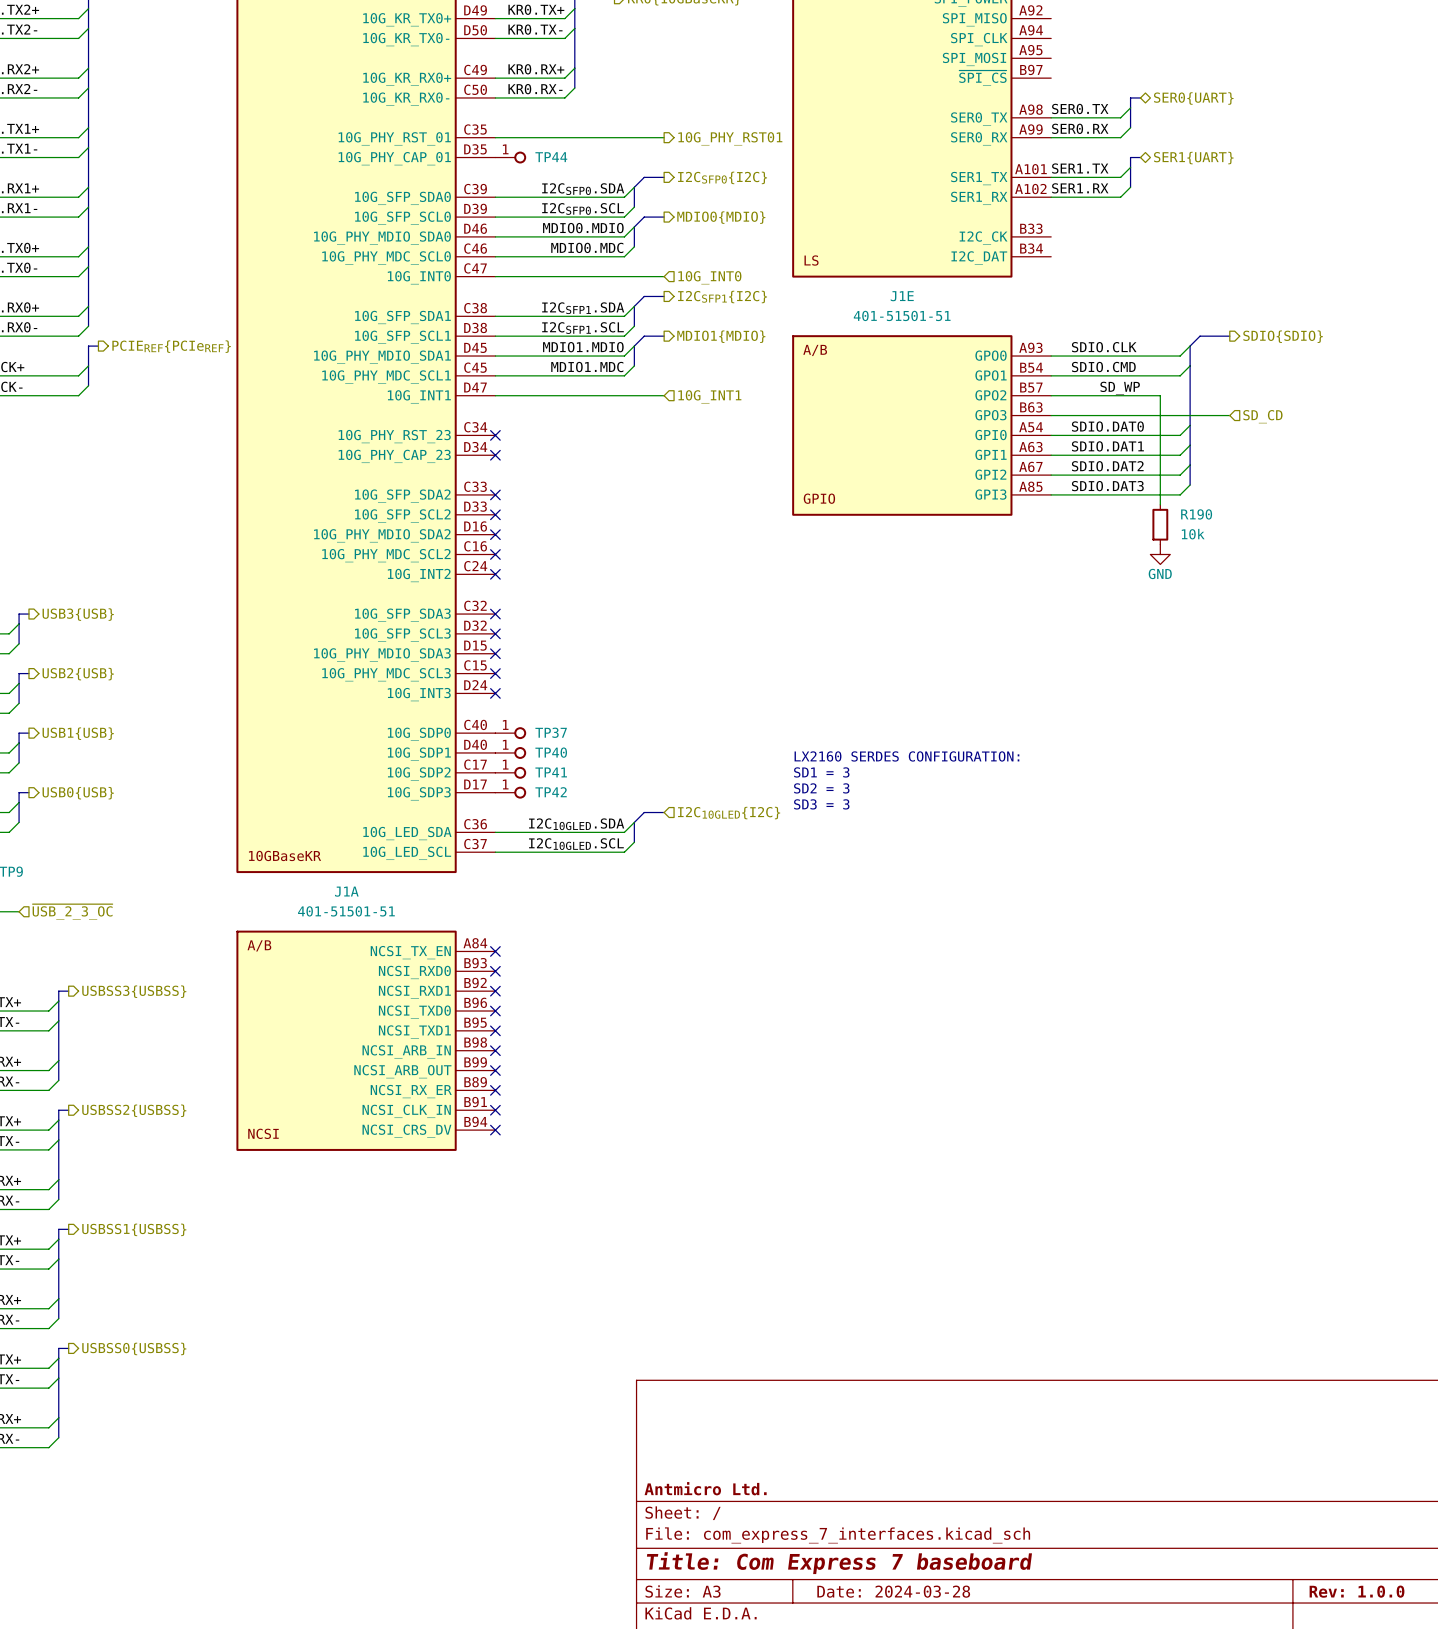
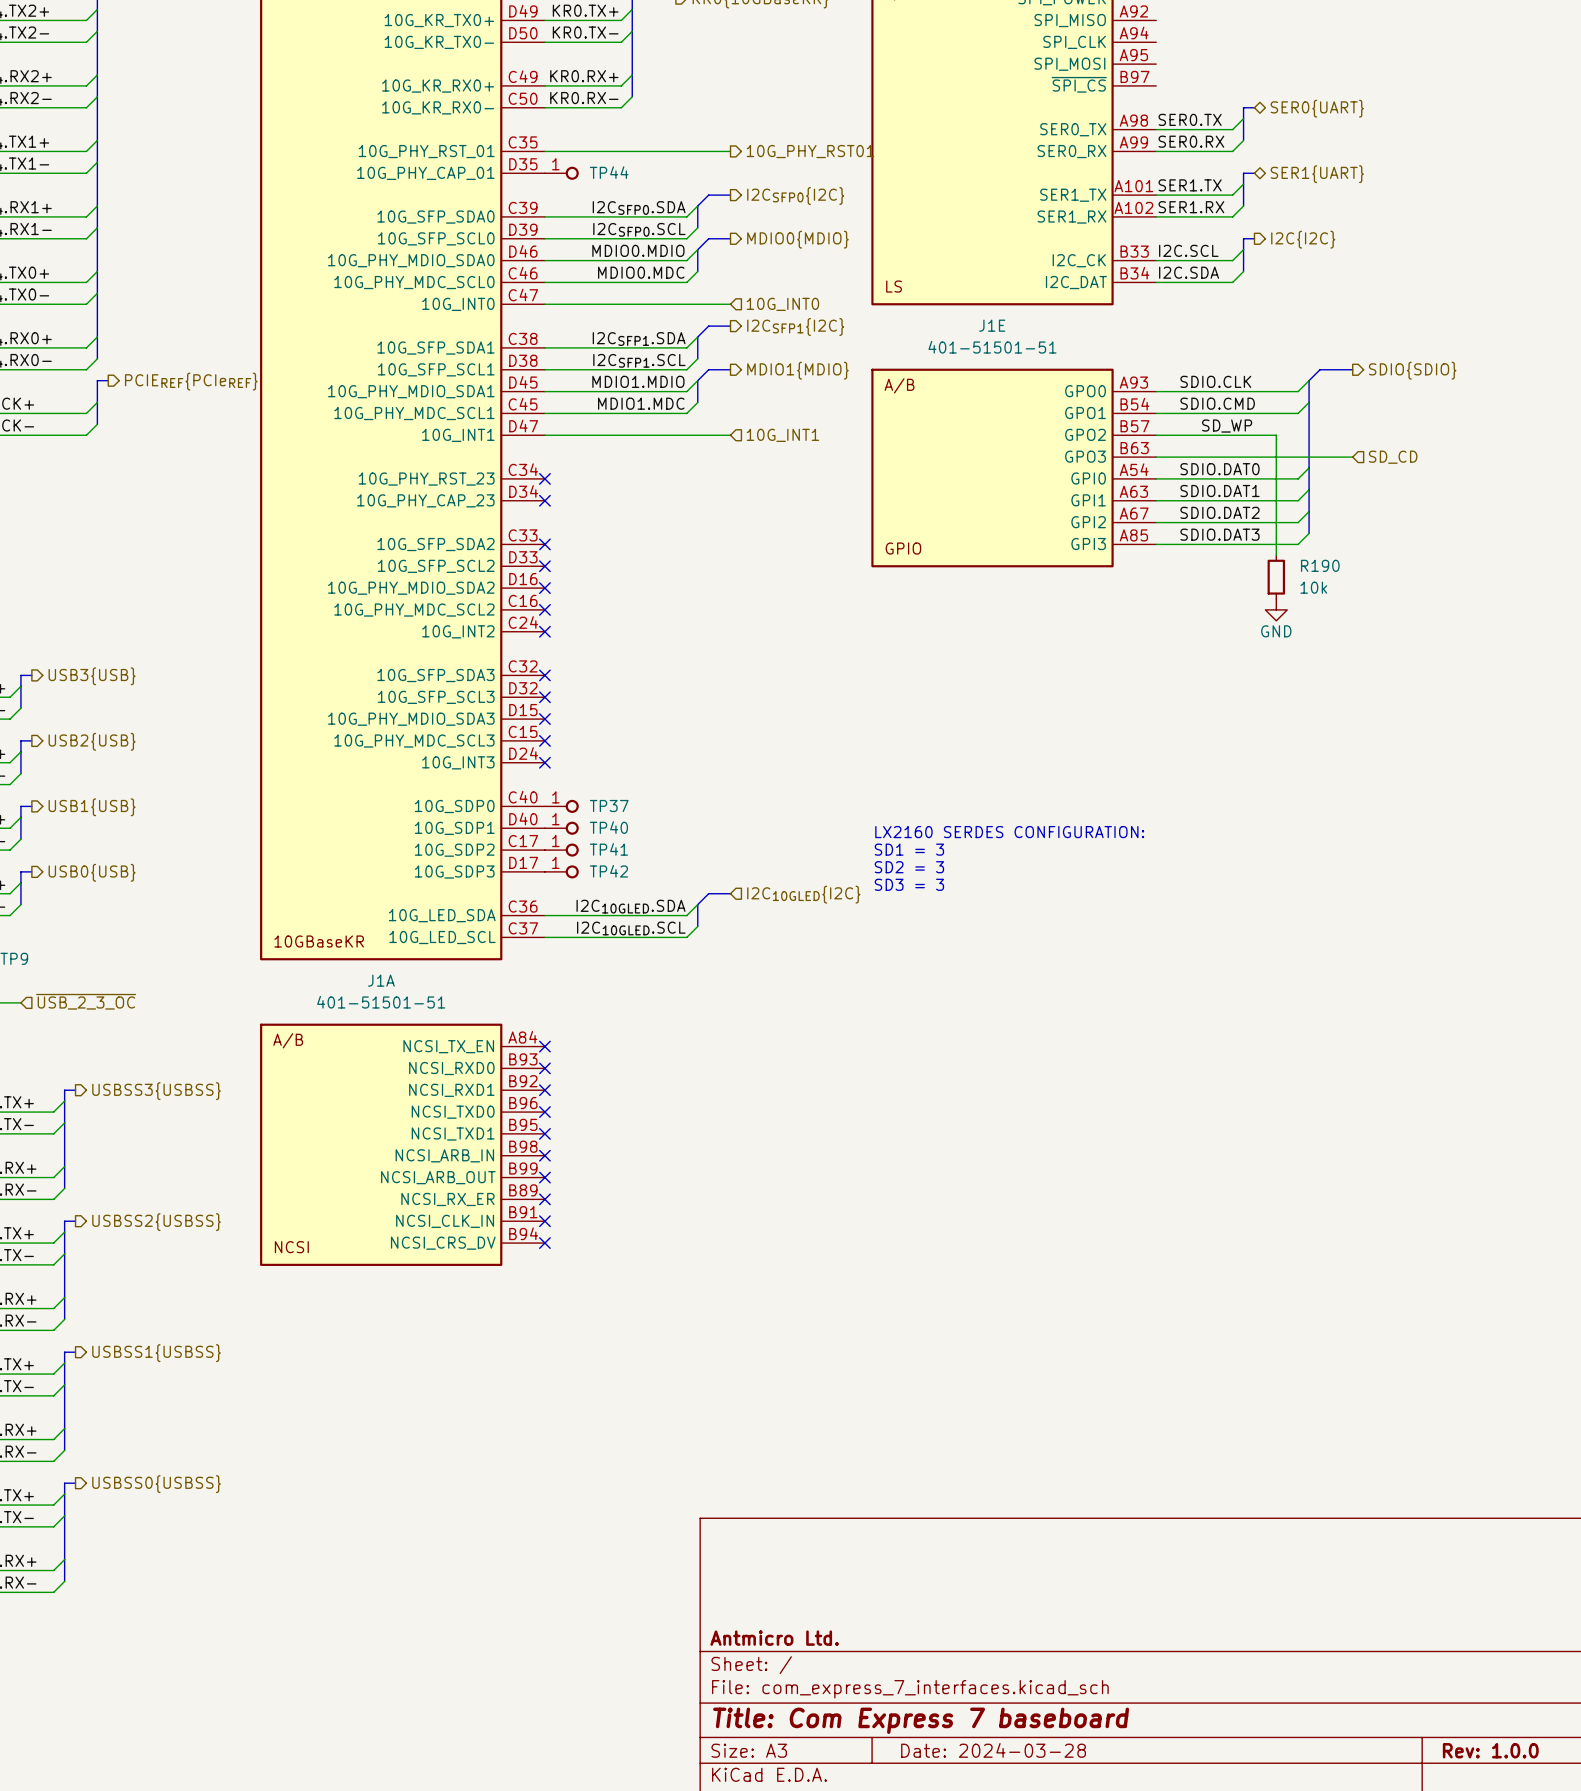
bus: none -> (1254, 238) (1243, 238) (1243, 271)
hierarchical label: none -> I2C{I2C} (1303, 239)
wire: none -> (1243, 249) (1232, 260) (1156, 260)
label: none -> I2C.SCL (1188, 250)
wire: none -> (1243, 271) (1232, 282) (1156, 282)
label: none -> I2C.SDA (1189, 272)

